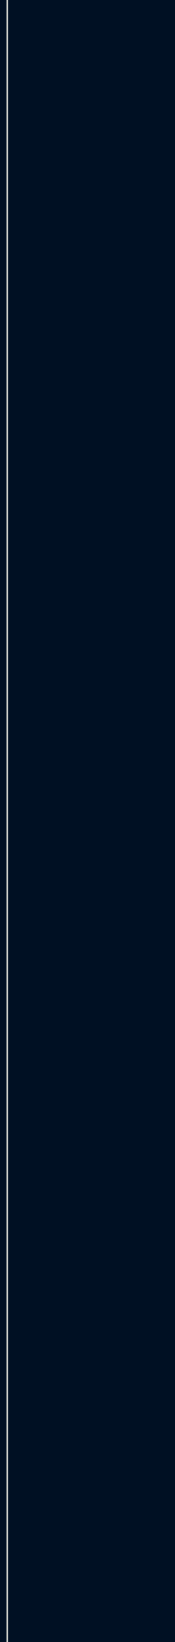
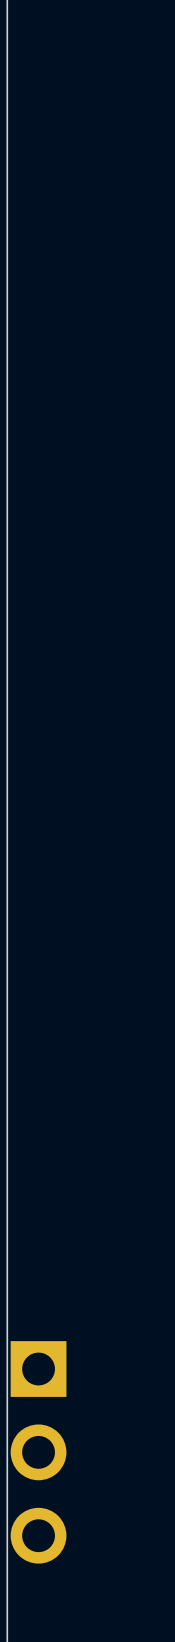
part: none -> (38, 1452)

